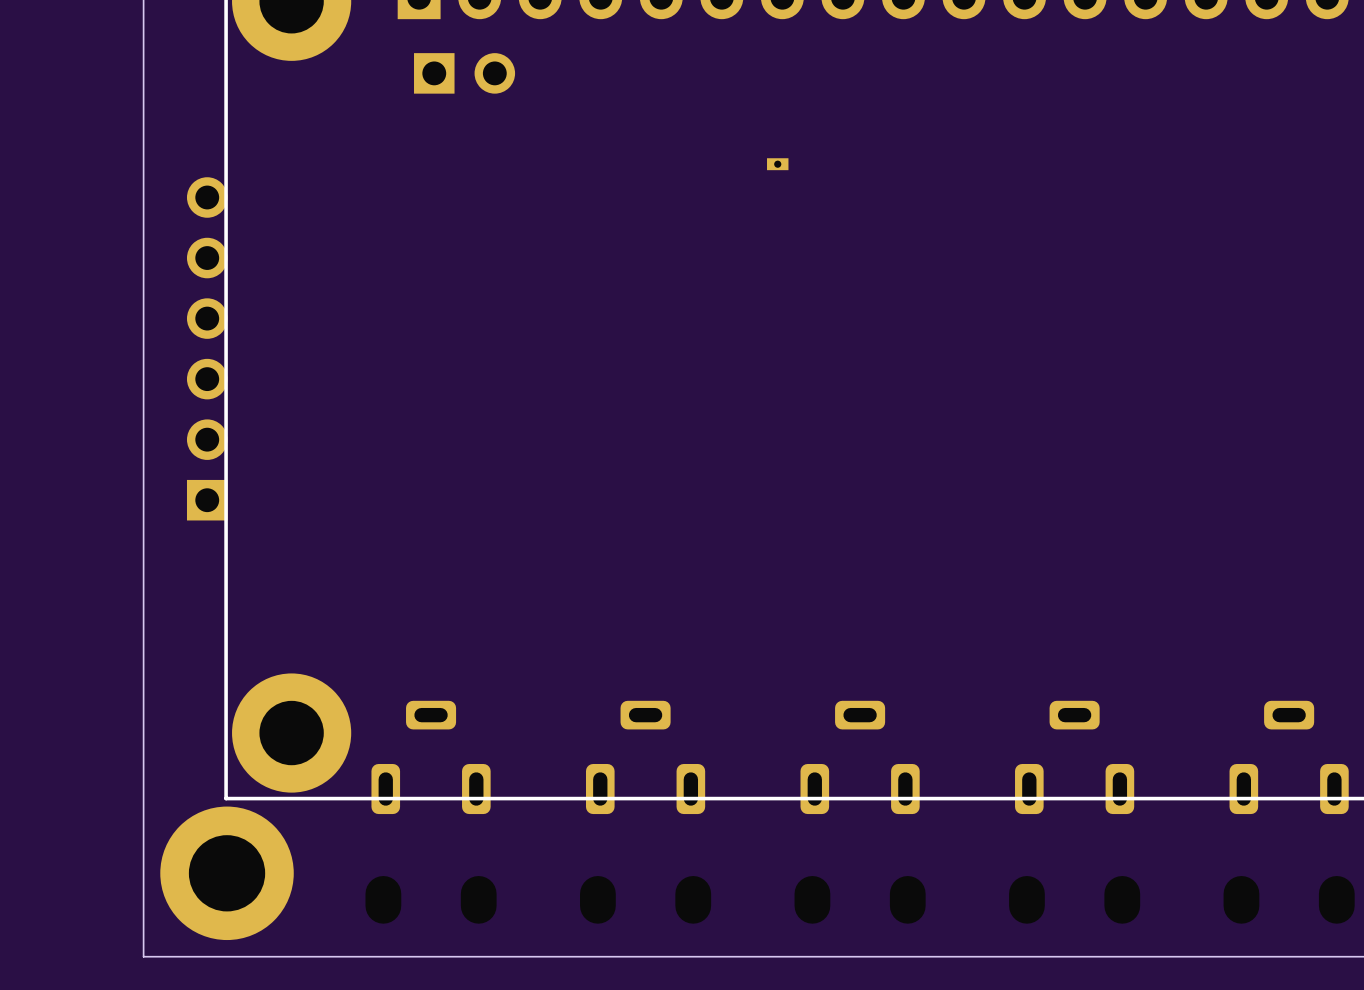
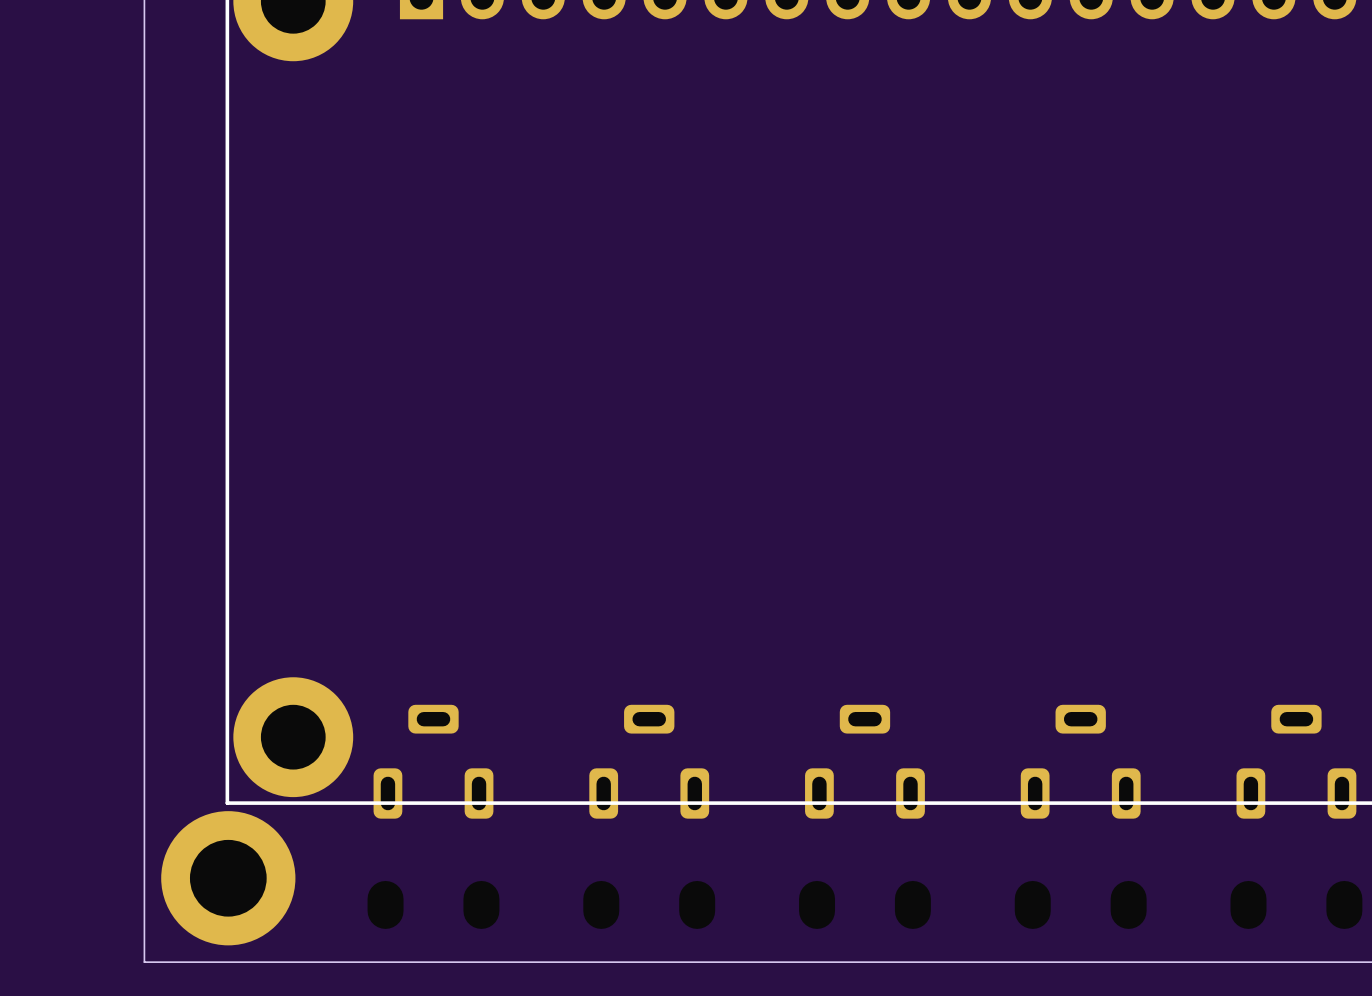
part: (464, 73) -> none
part: (777, 164) -> none
part: (207, 348) -> none

